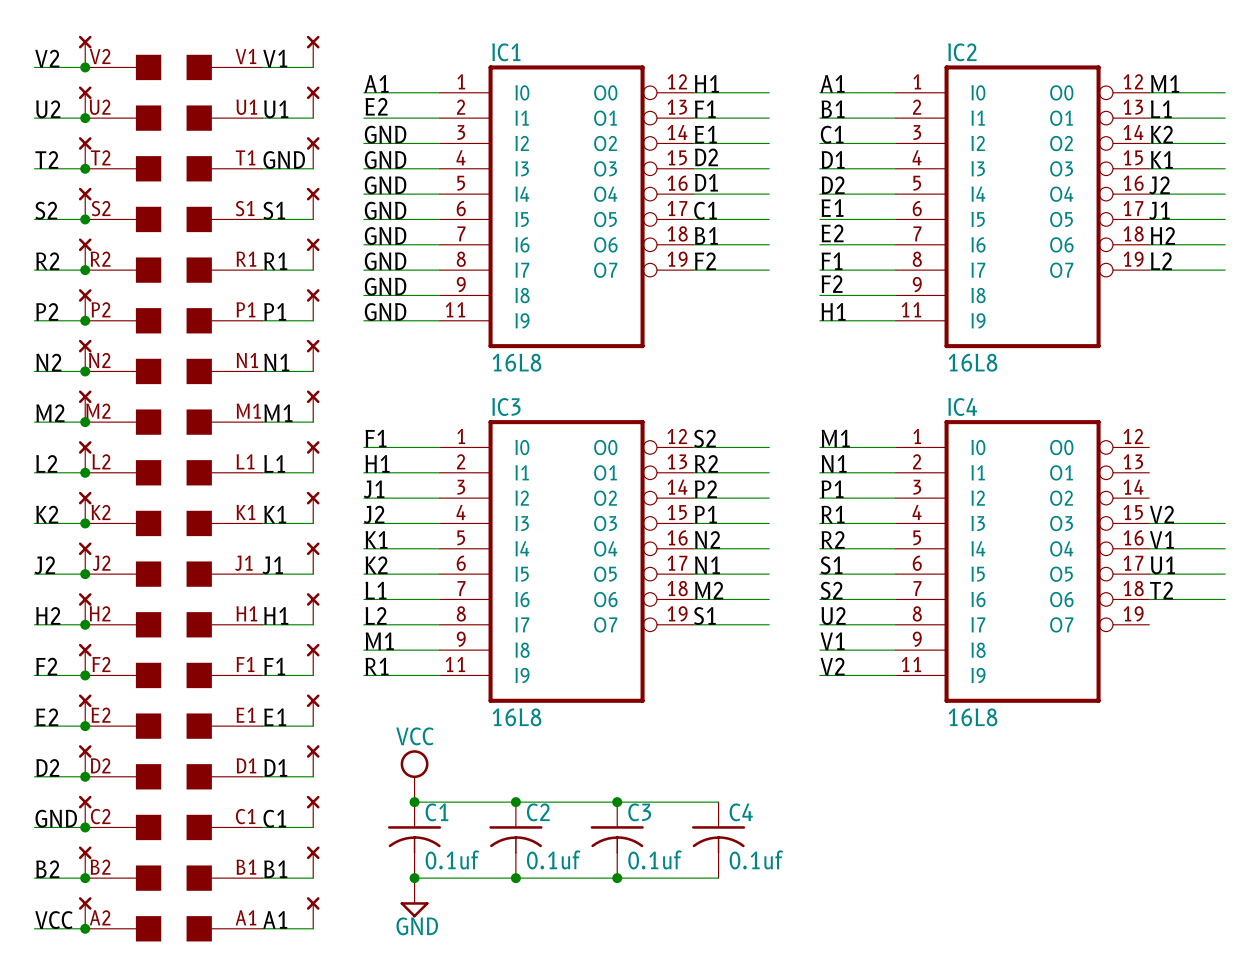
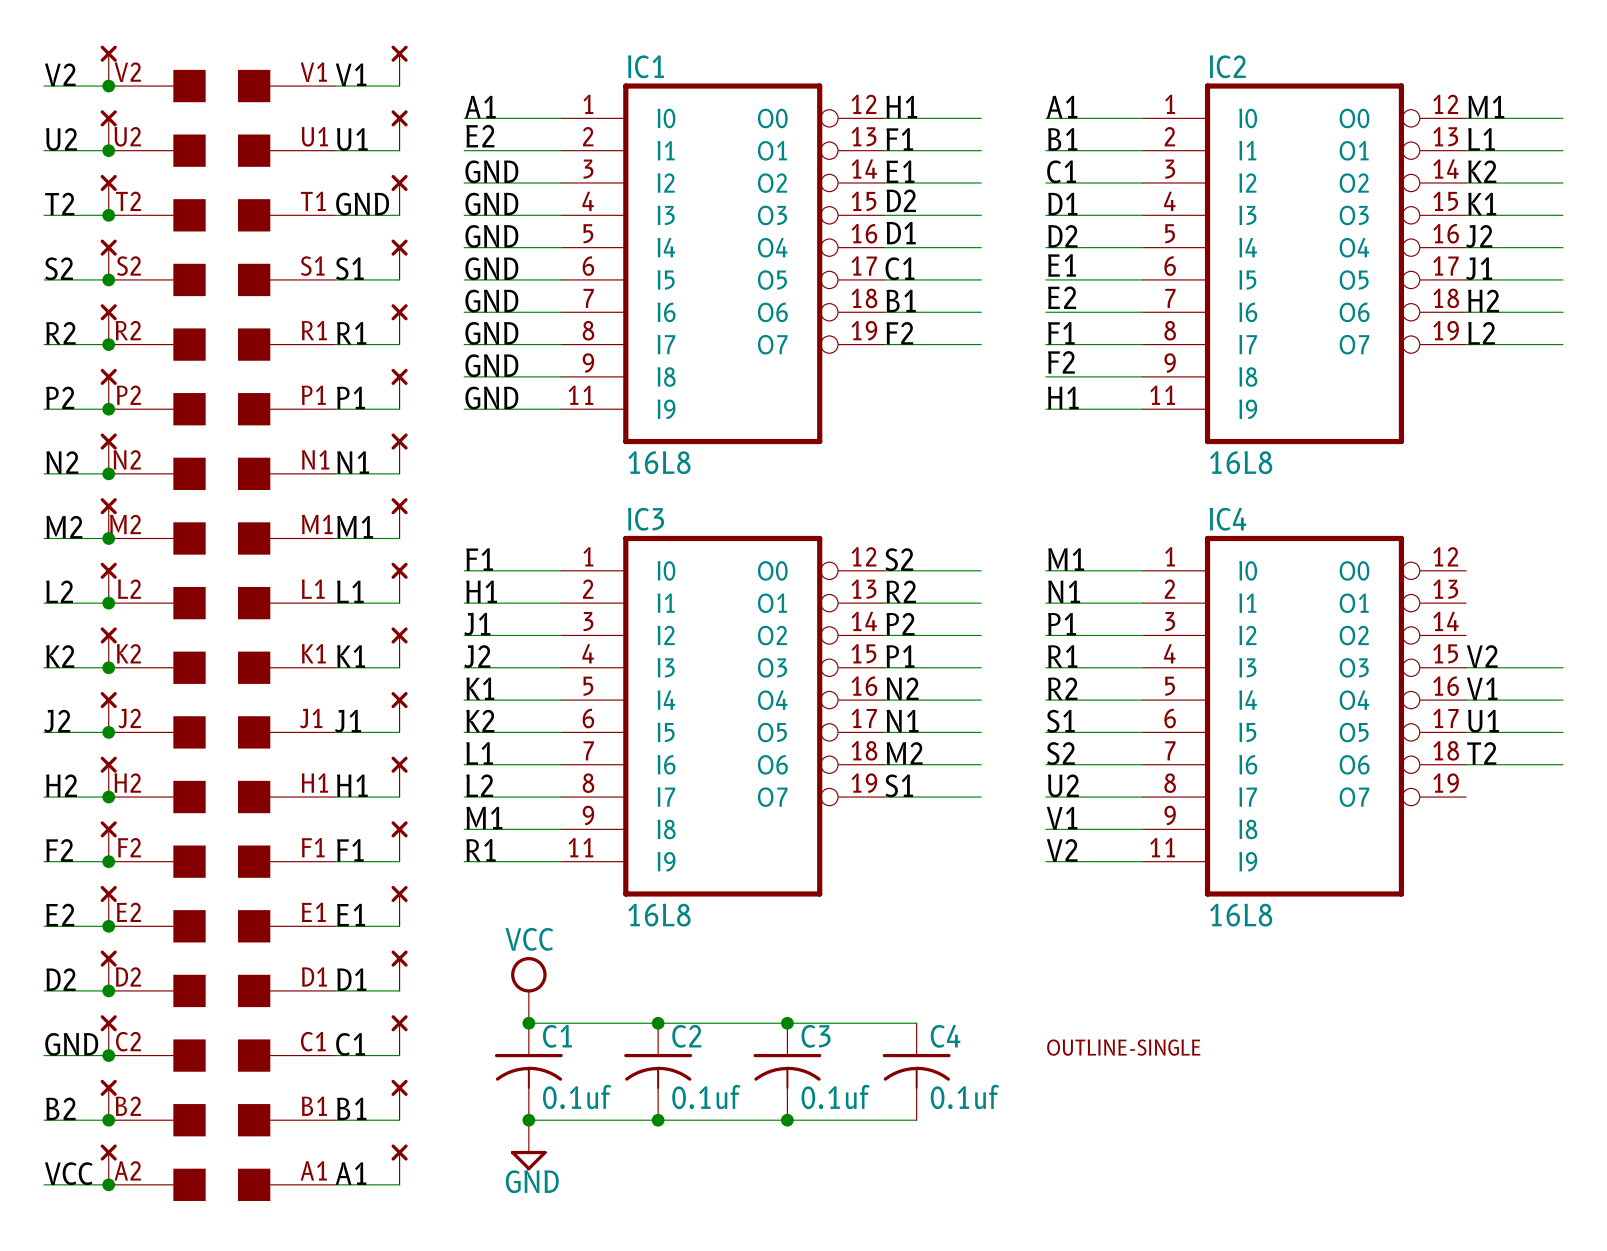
part: none -> OUTLINE-SINGLE (1123, 1047)

